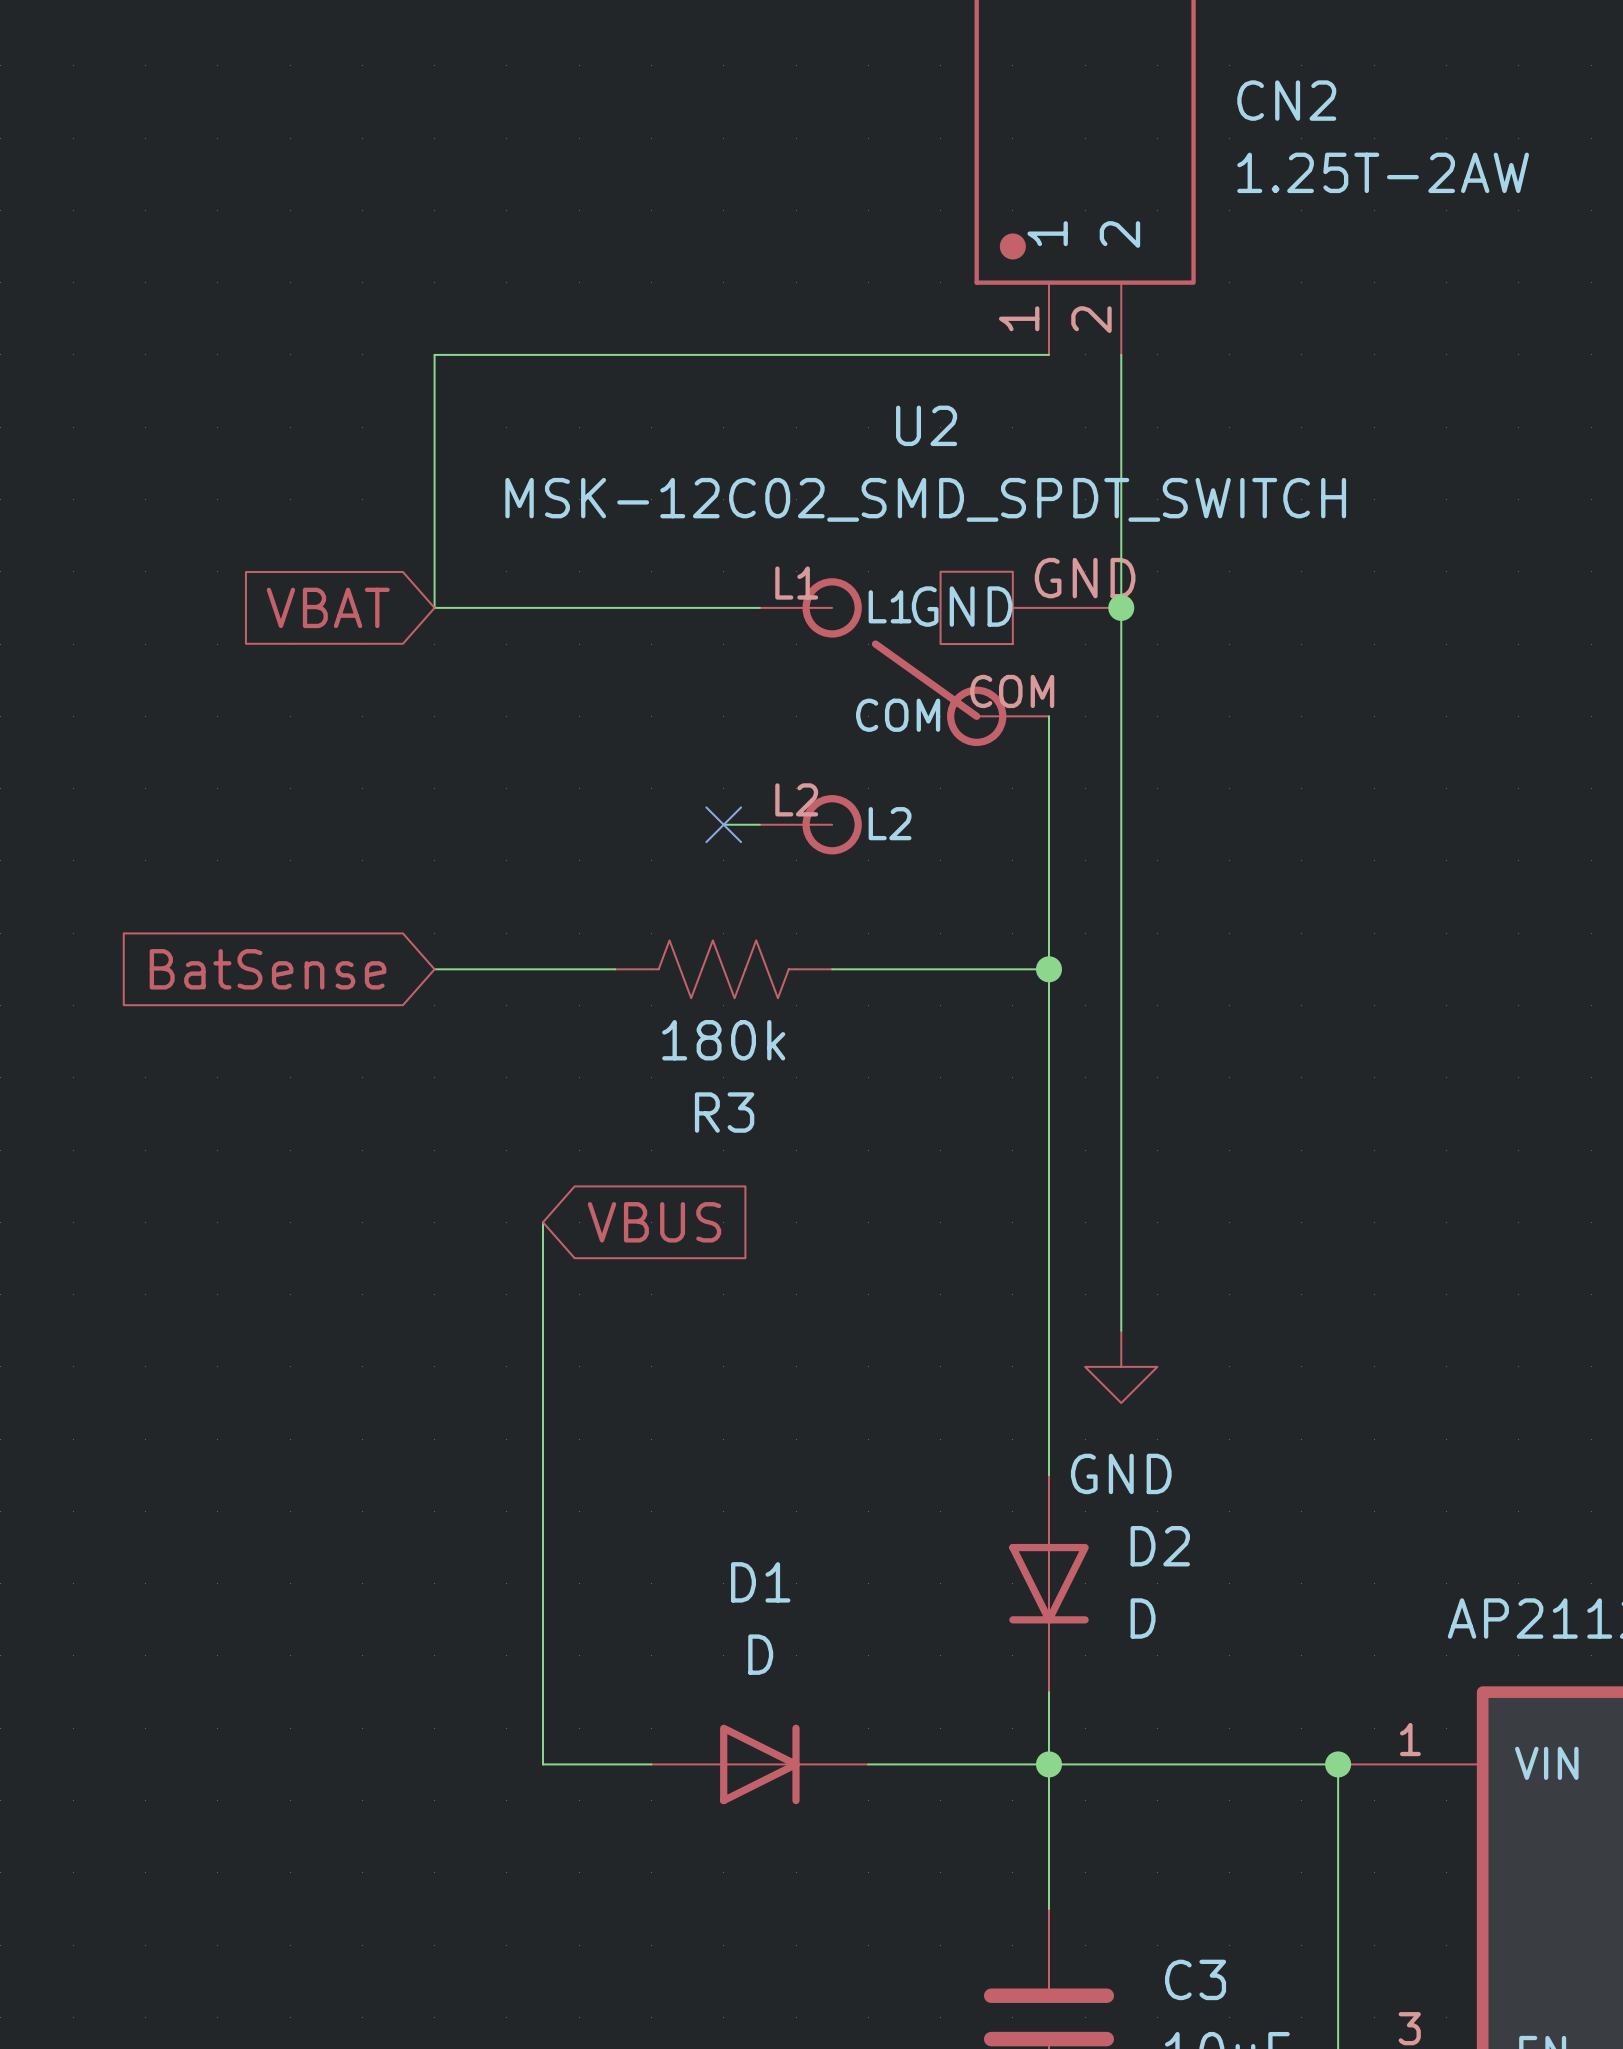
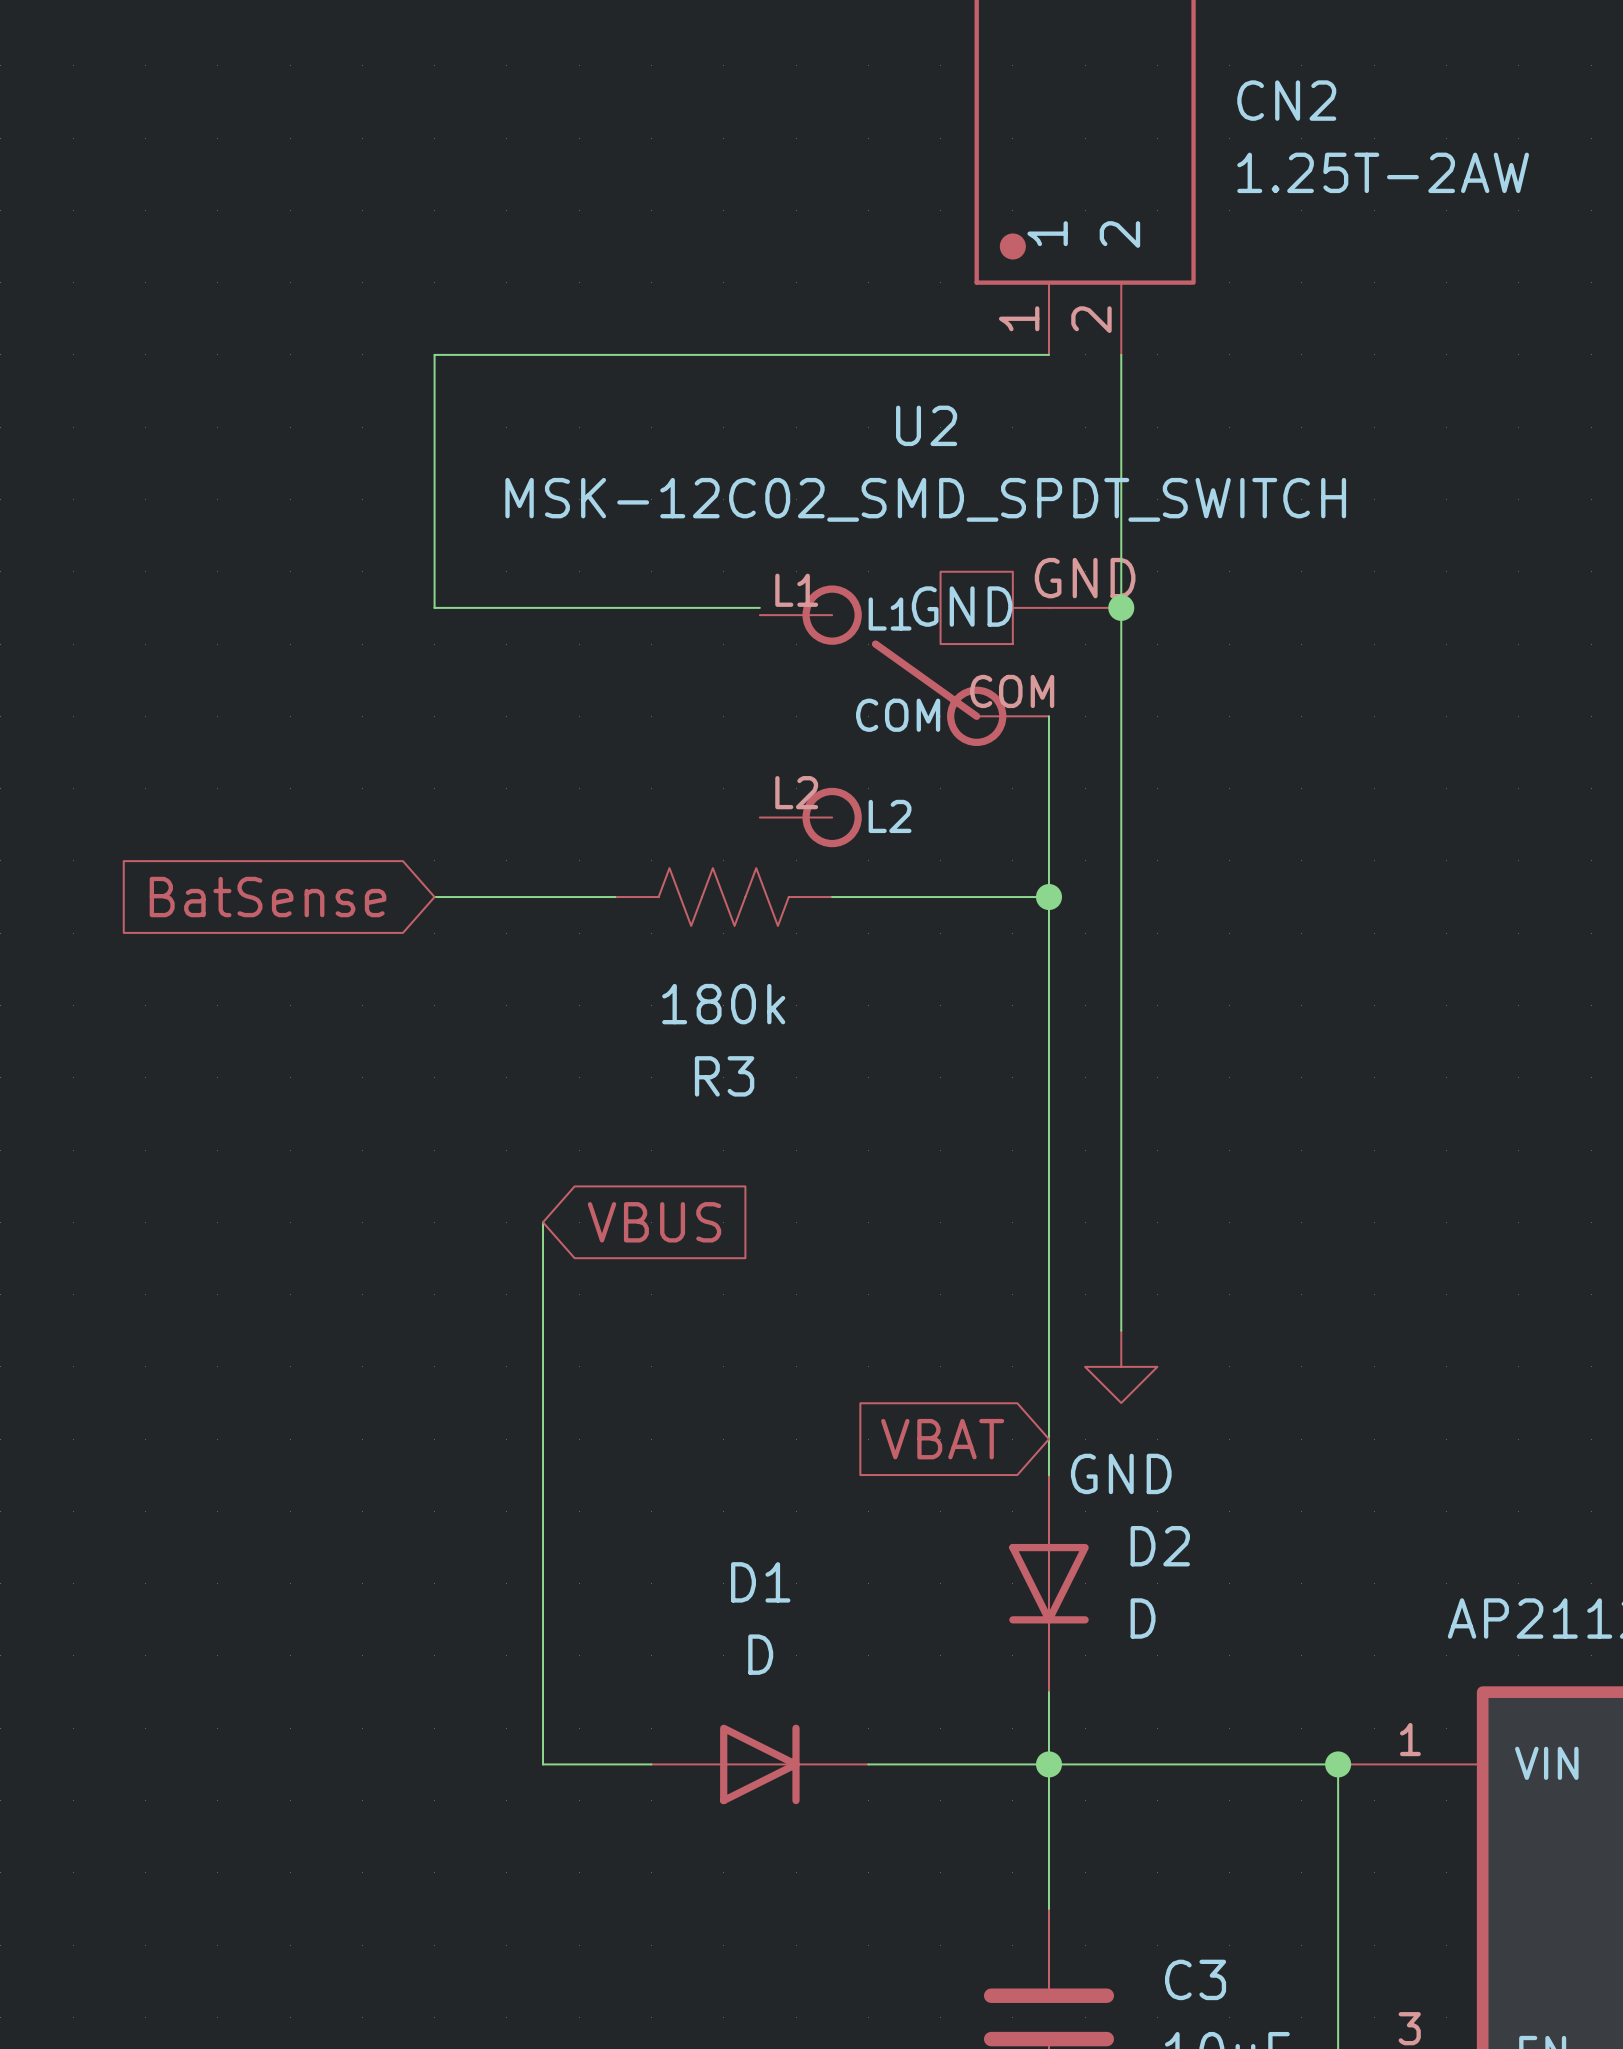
U2 symbol: [759, 571, 1122, 855] -> [759, 571, 1122, 848]
global label: VBAT (328, 607) -> none
wire: (723, 824) (759, 824) -> none
no-connect mark: (723, 824) -> none
global label position: BatSense (268, 969) -> BatSense (268, 897)
wire: (434, 969) (615, 969) -> (434, 897) (615, 897)
R3 position: (723, 969) -> (723, 897)
wire: (832, 969) (1048, 969) -> (832, 897) (1048, 897)
junction position: (1048, 969) -> (1048, 897)
R3 value position: 180k (723, 1040) -> 180k (723, 1004)
R3 name position: R3 (724, 1112) -> R3 (724, 1076)
global label: none -> VBAT (942, 1439)

